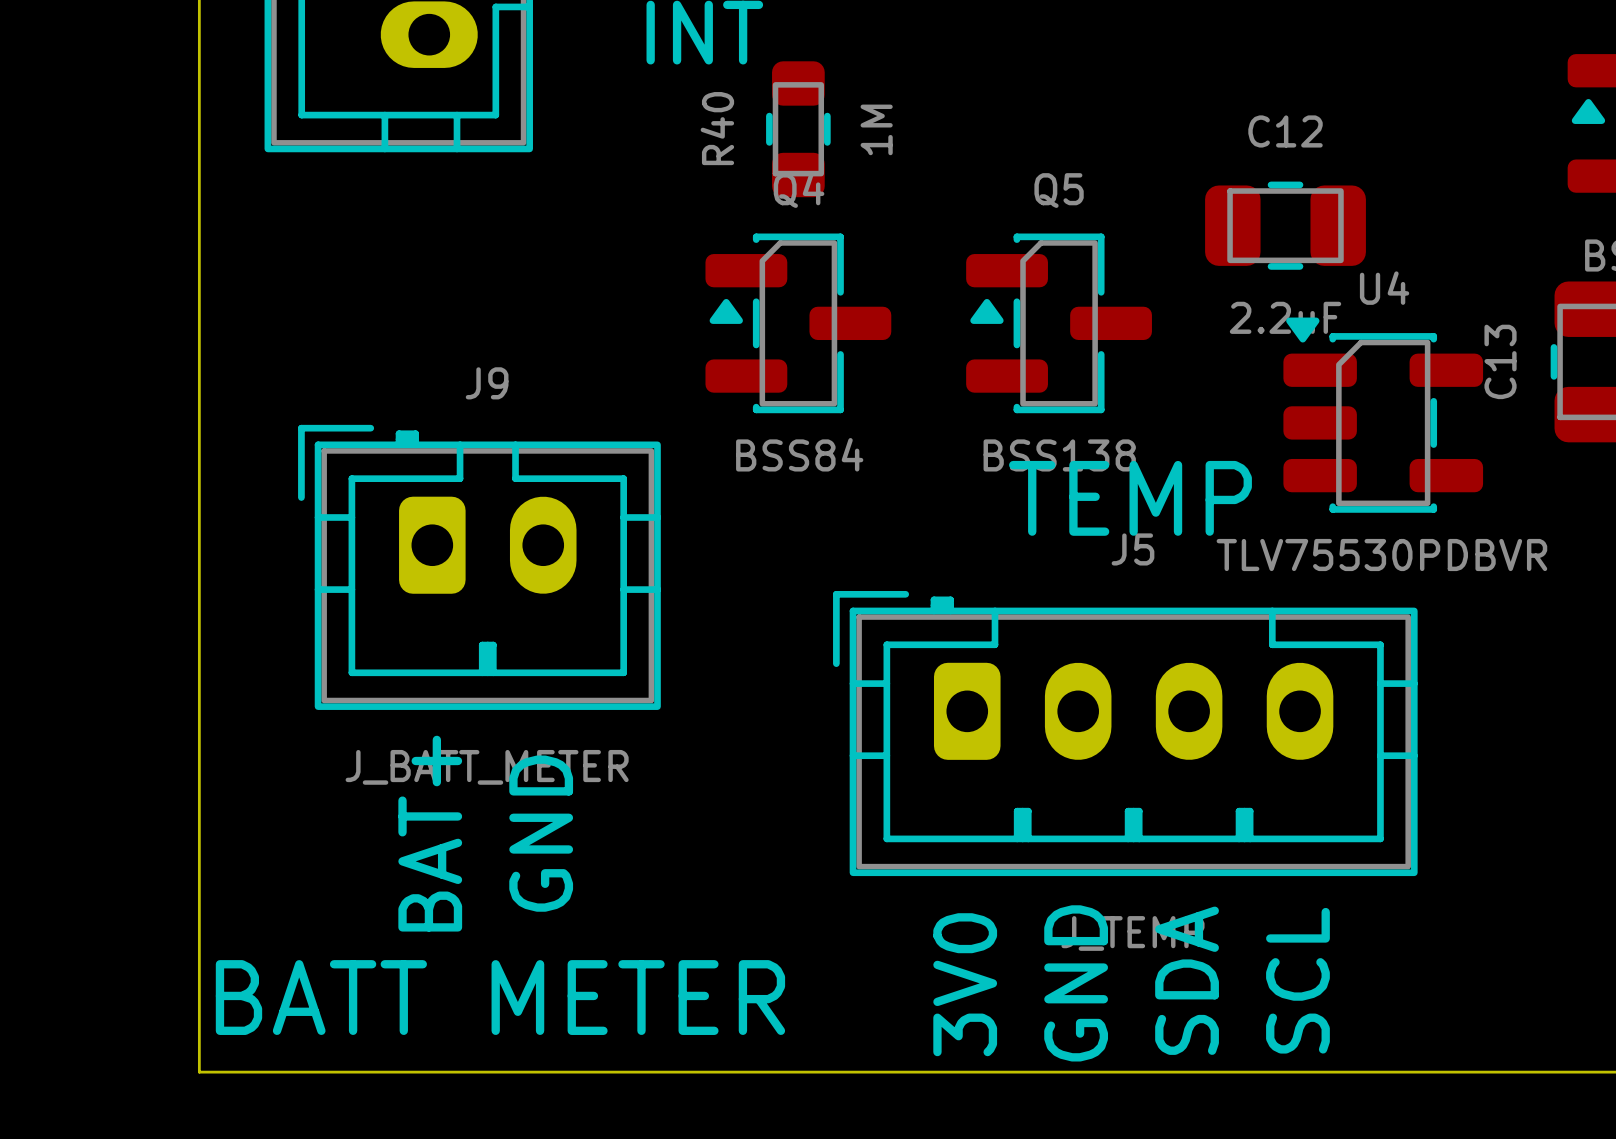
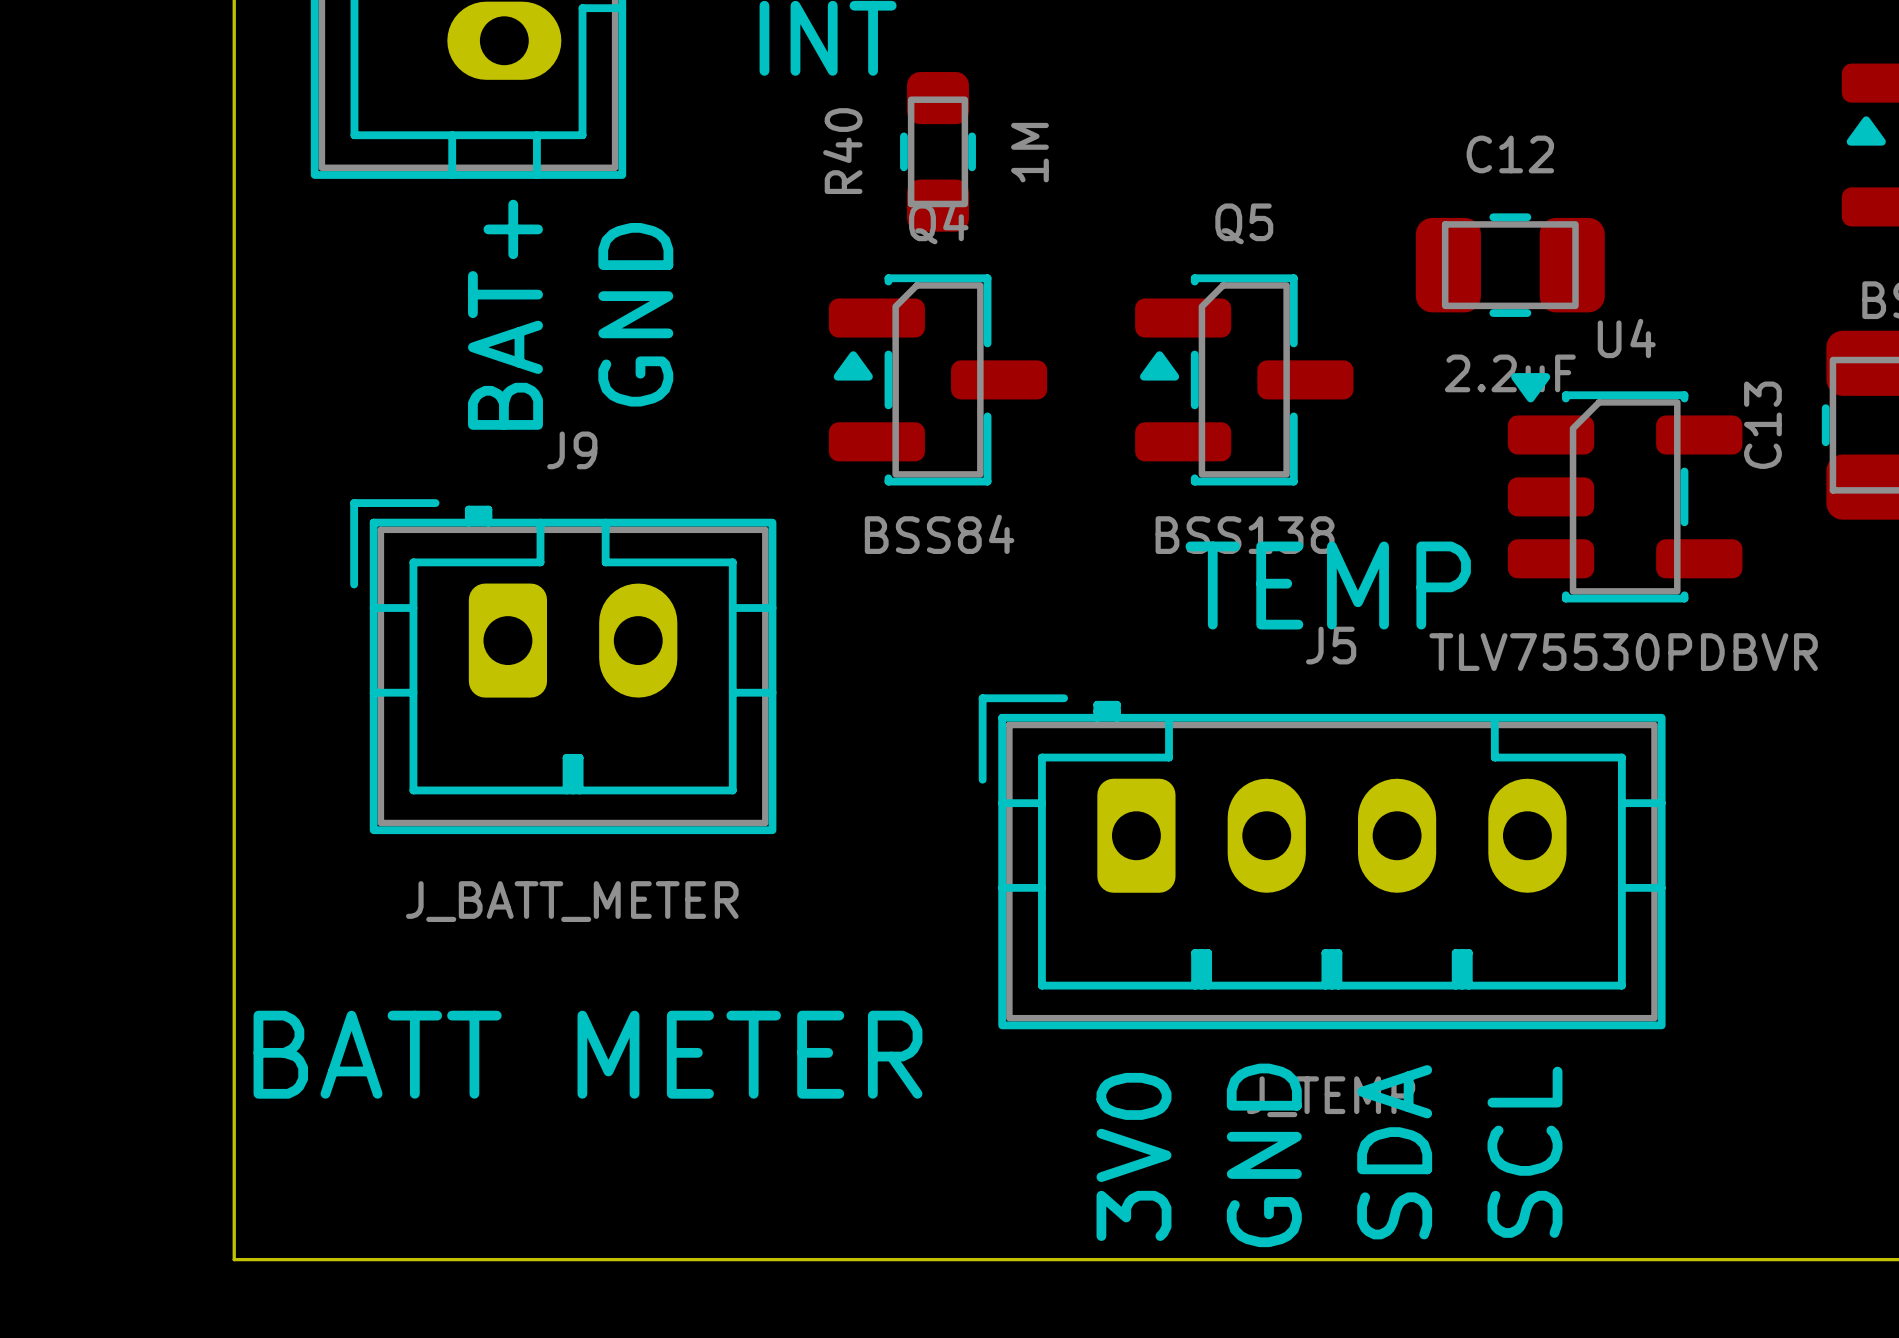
text position: BAT+ (430, 833) -> BAT+ (505, 314)
text position: GND (541, 833) -> GND (635, 314)
text position: BATT METER (500, 997) -> BATT METER (587, 1054)

